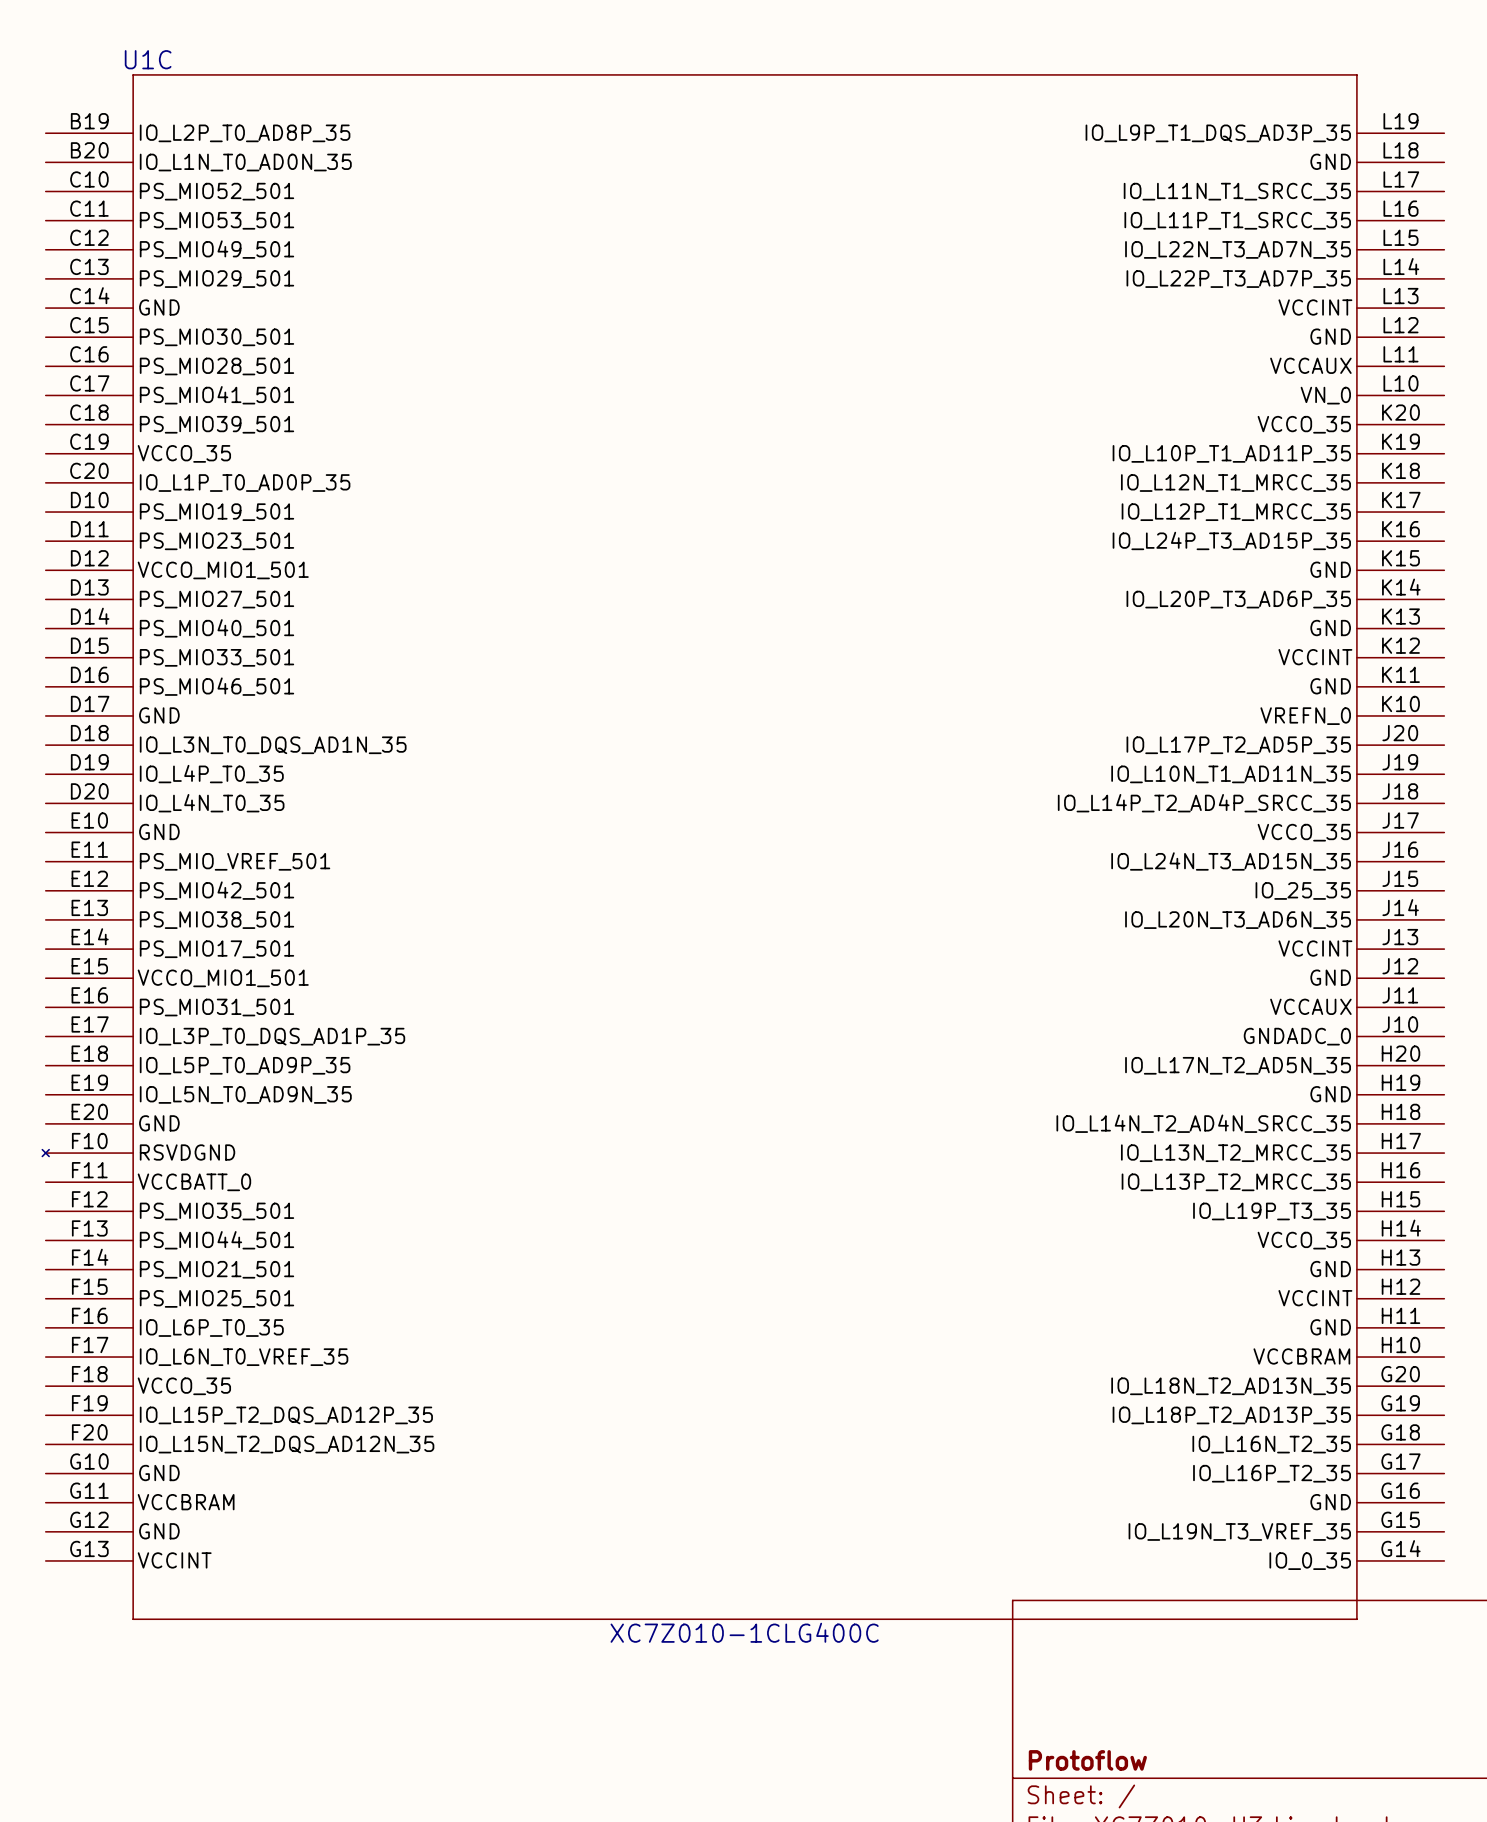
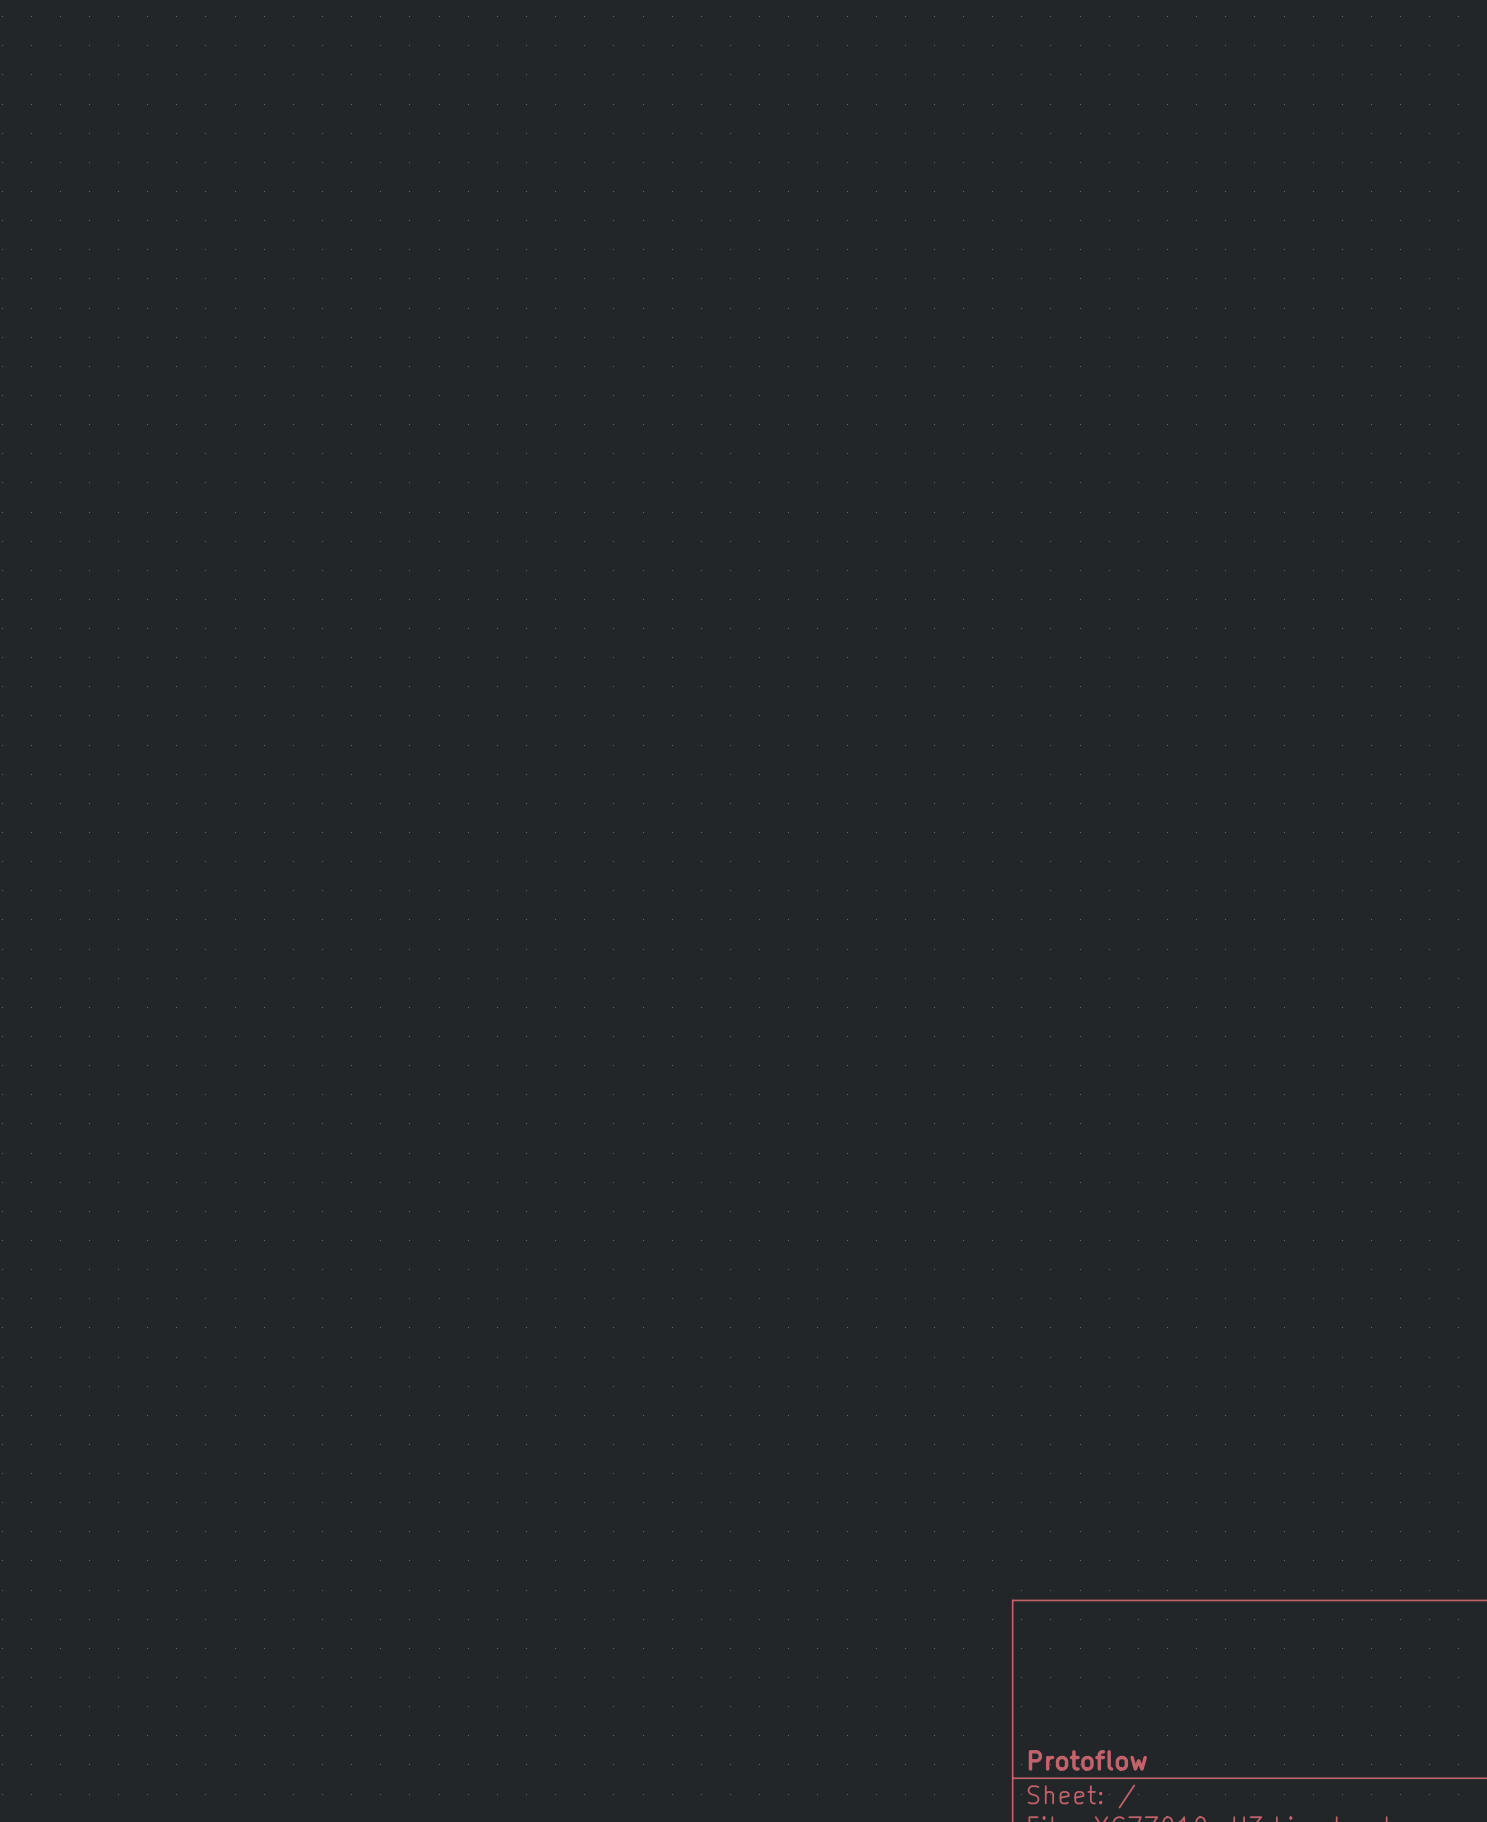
U1C: XC7Z010-1CLG400C (743, 847) -> none

